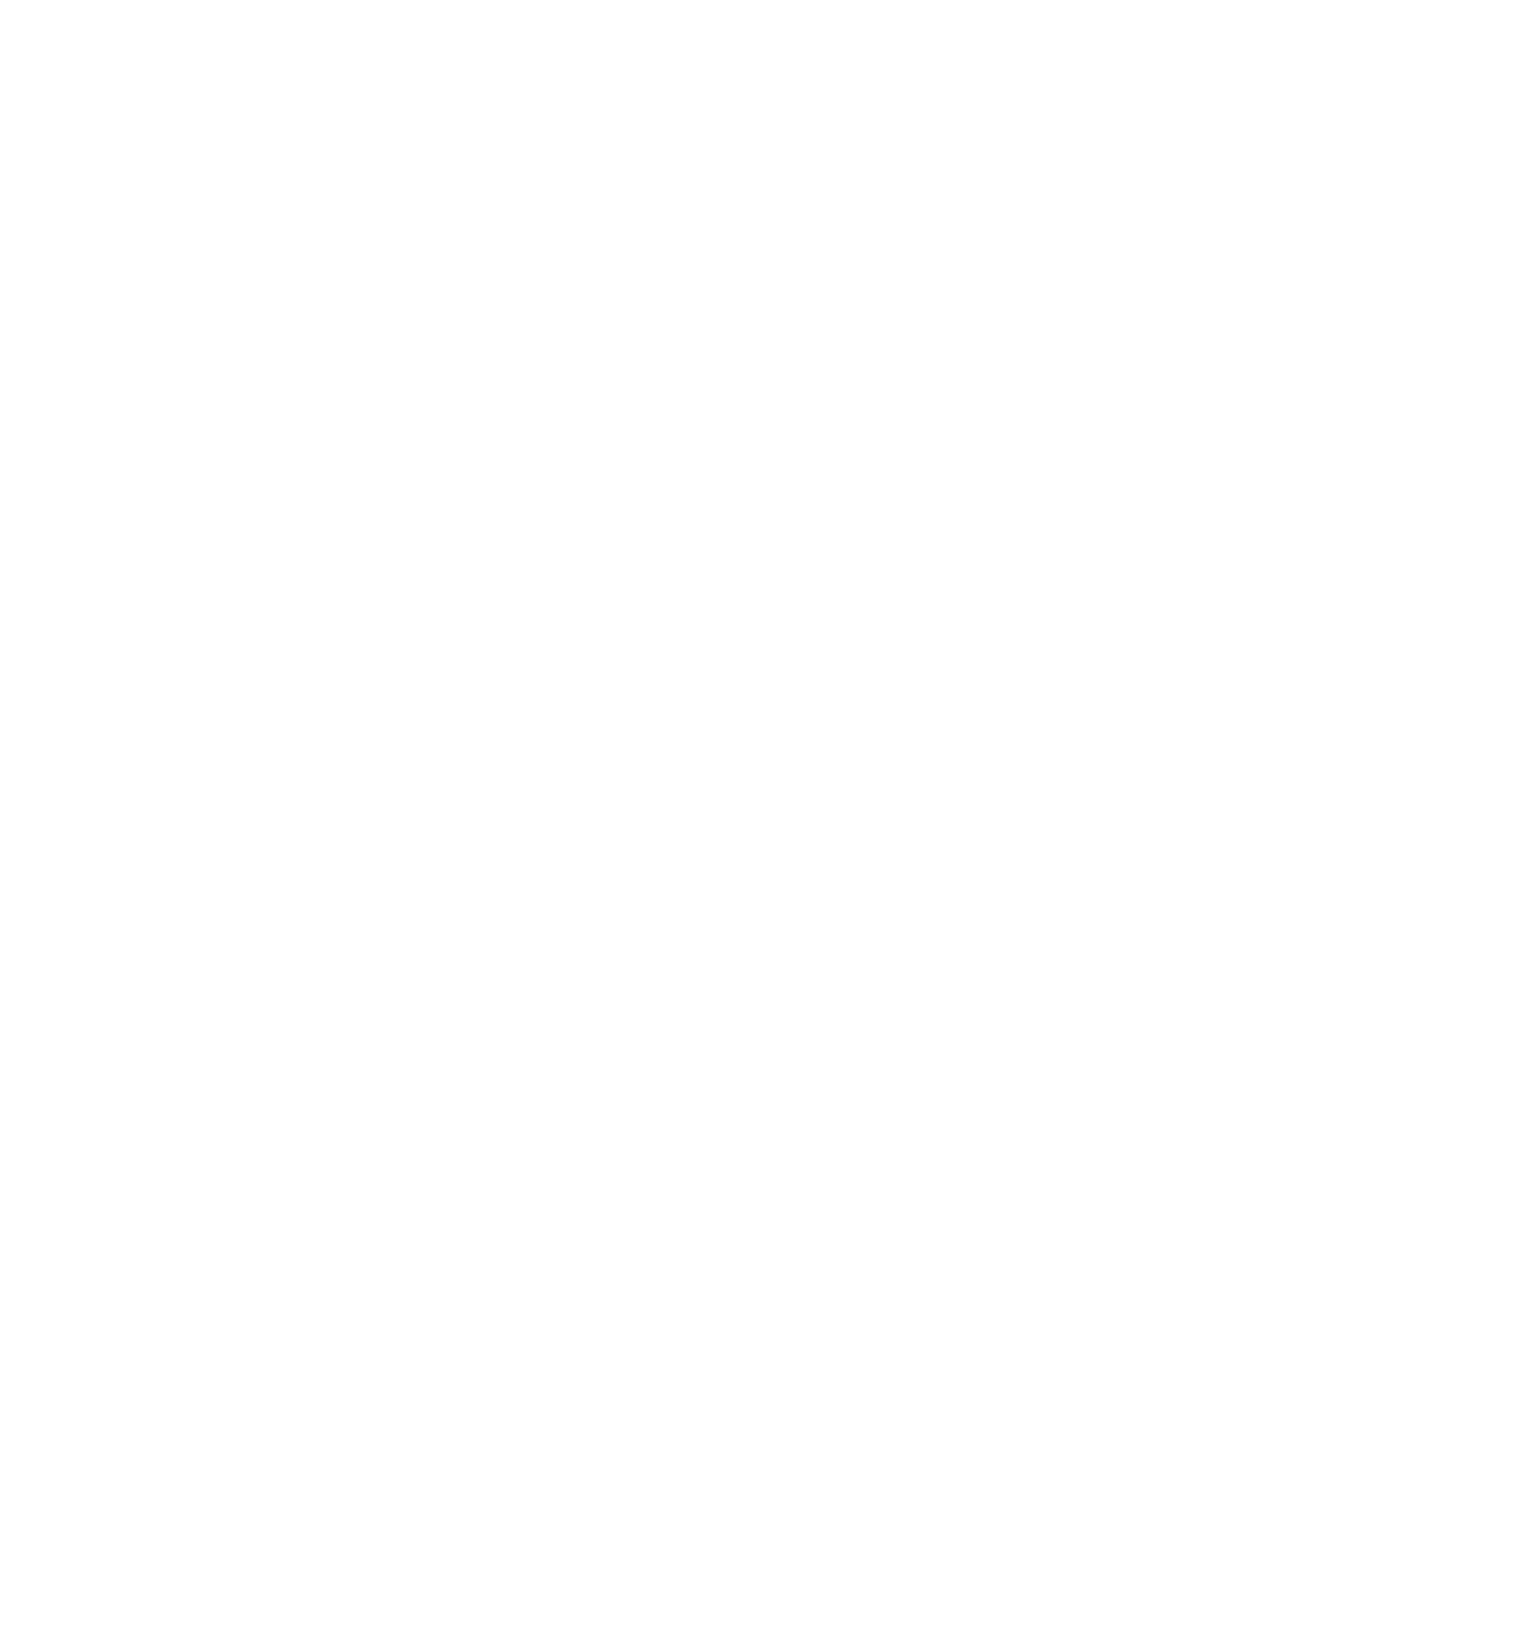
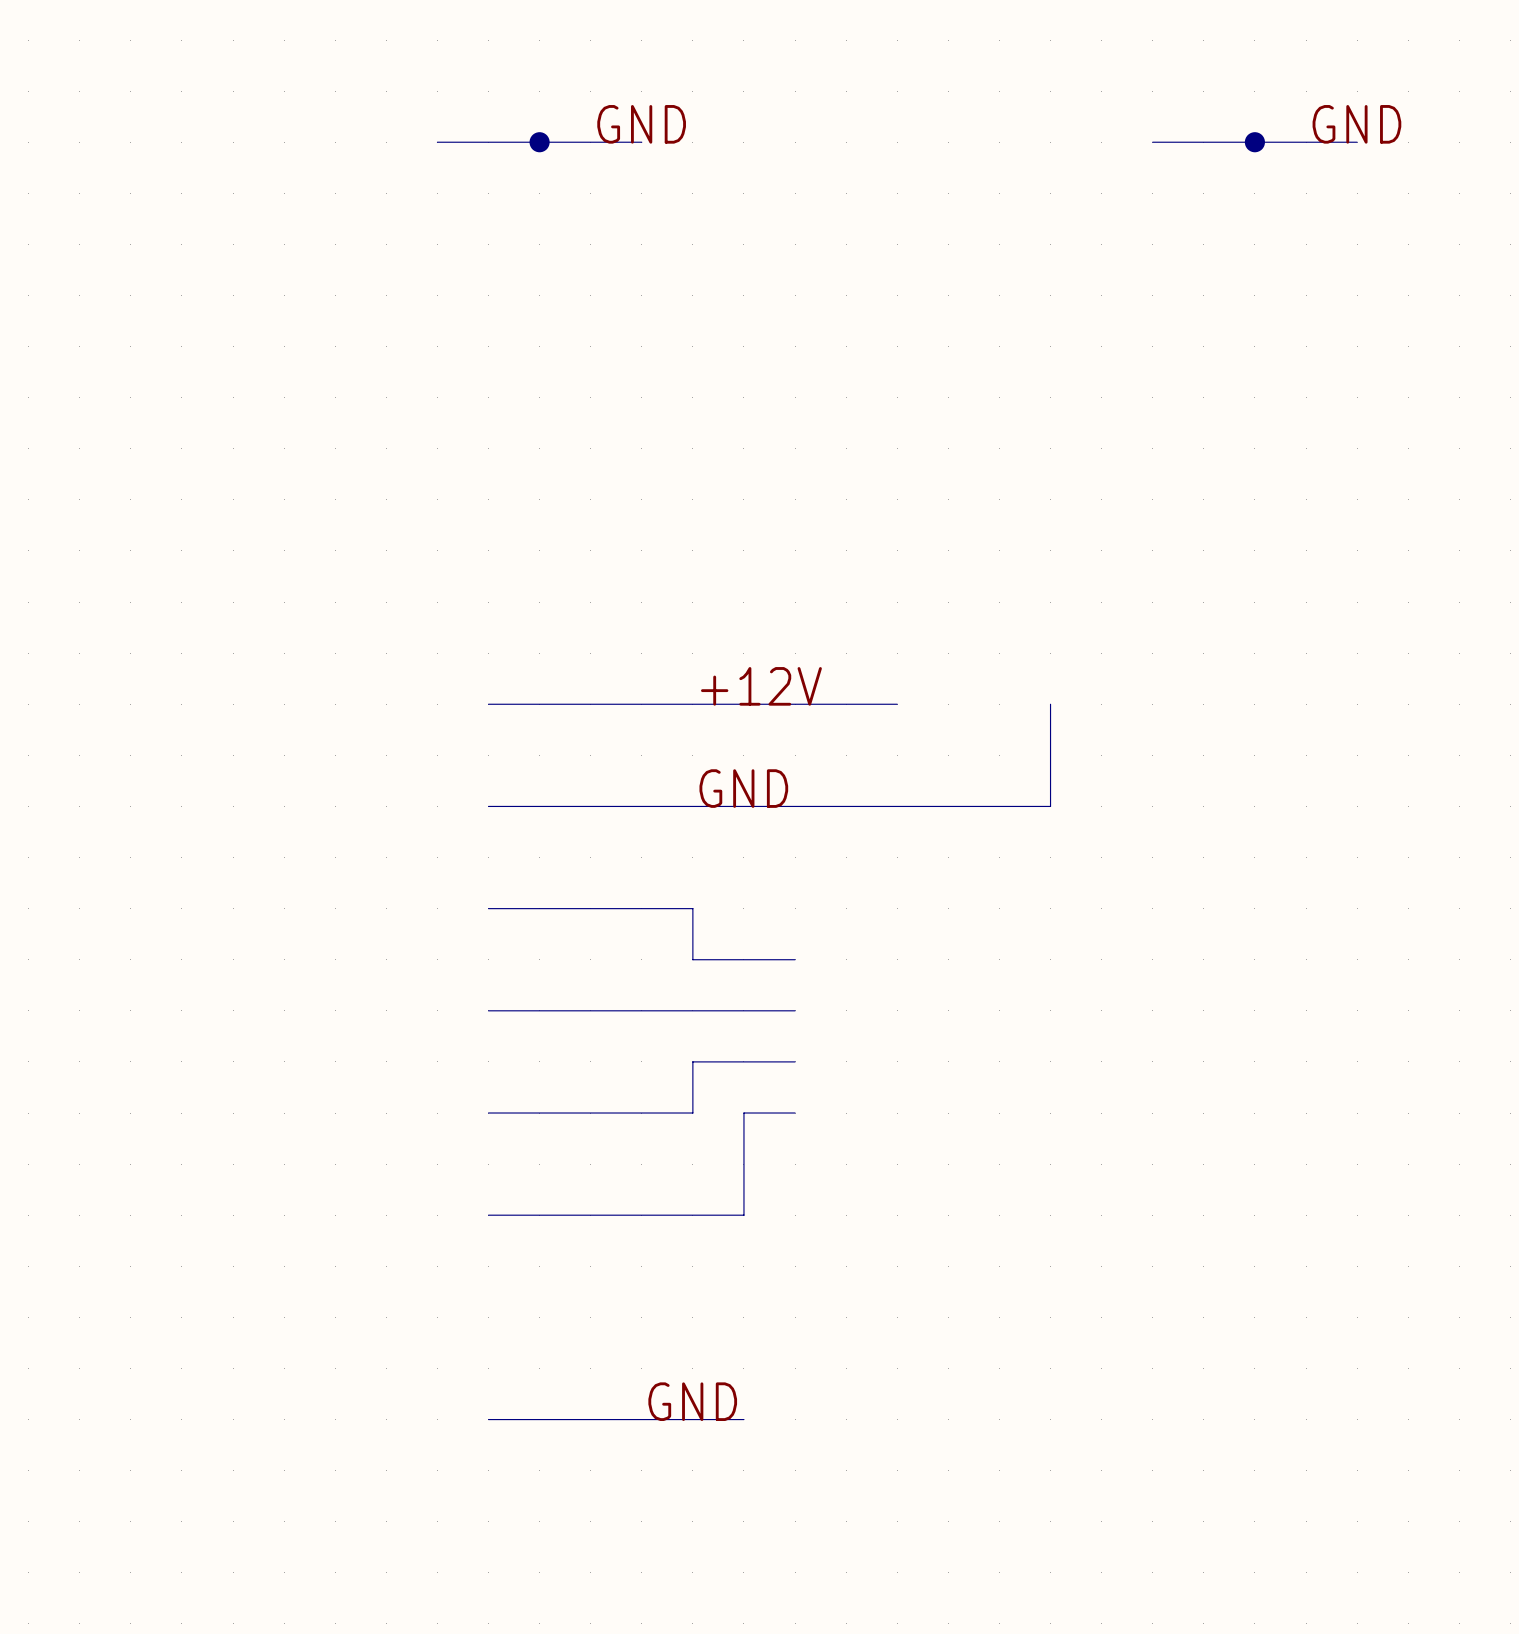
label: none -> GND (641, 124)
label: none -> GND (1356, 124)
wire: none -> (437, 142) (641, 142)
junction: none -> (539, 142)
wire: none -> (1152, 142) (1357, 142)
junction: none -> (1254, 142)
label: none -> +12V (761, 686)
wire: none -> (488, 704) (897, 704)
wire: none -> (1050, 704) (1050, 806) (488, 806)
label: none -> GND (743, 788)
wire: none -> (488, 908) (692, 908) (692, 959) (795, 959)
wire: none -> (488, 1010) (795, 1010)
wire: none -> (795, 1061) (692, 1061) (692, 1113) (488, 1113)
wire: none -> (795, 1113) (743, 1113) (743, 1215) (488, 1215)
label: none -> GND (692, 1401)
wire: none -> (488, 1419) (743, 1419)

